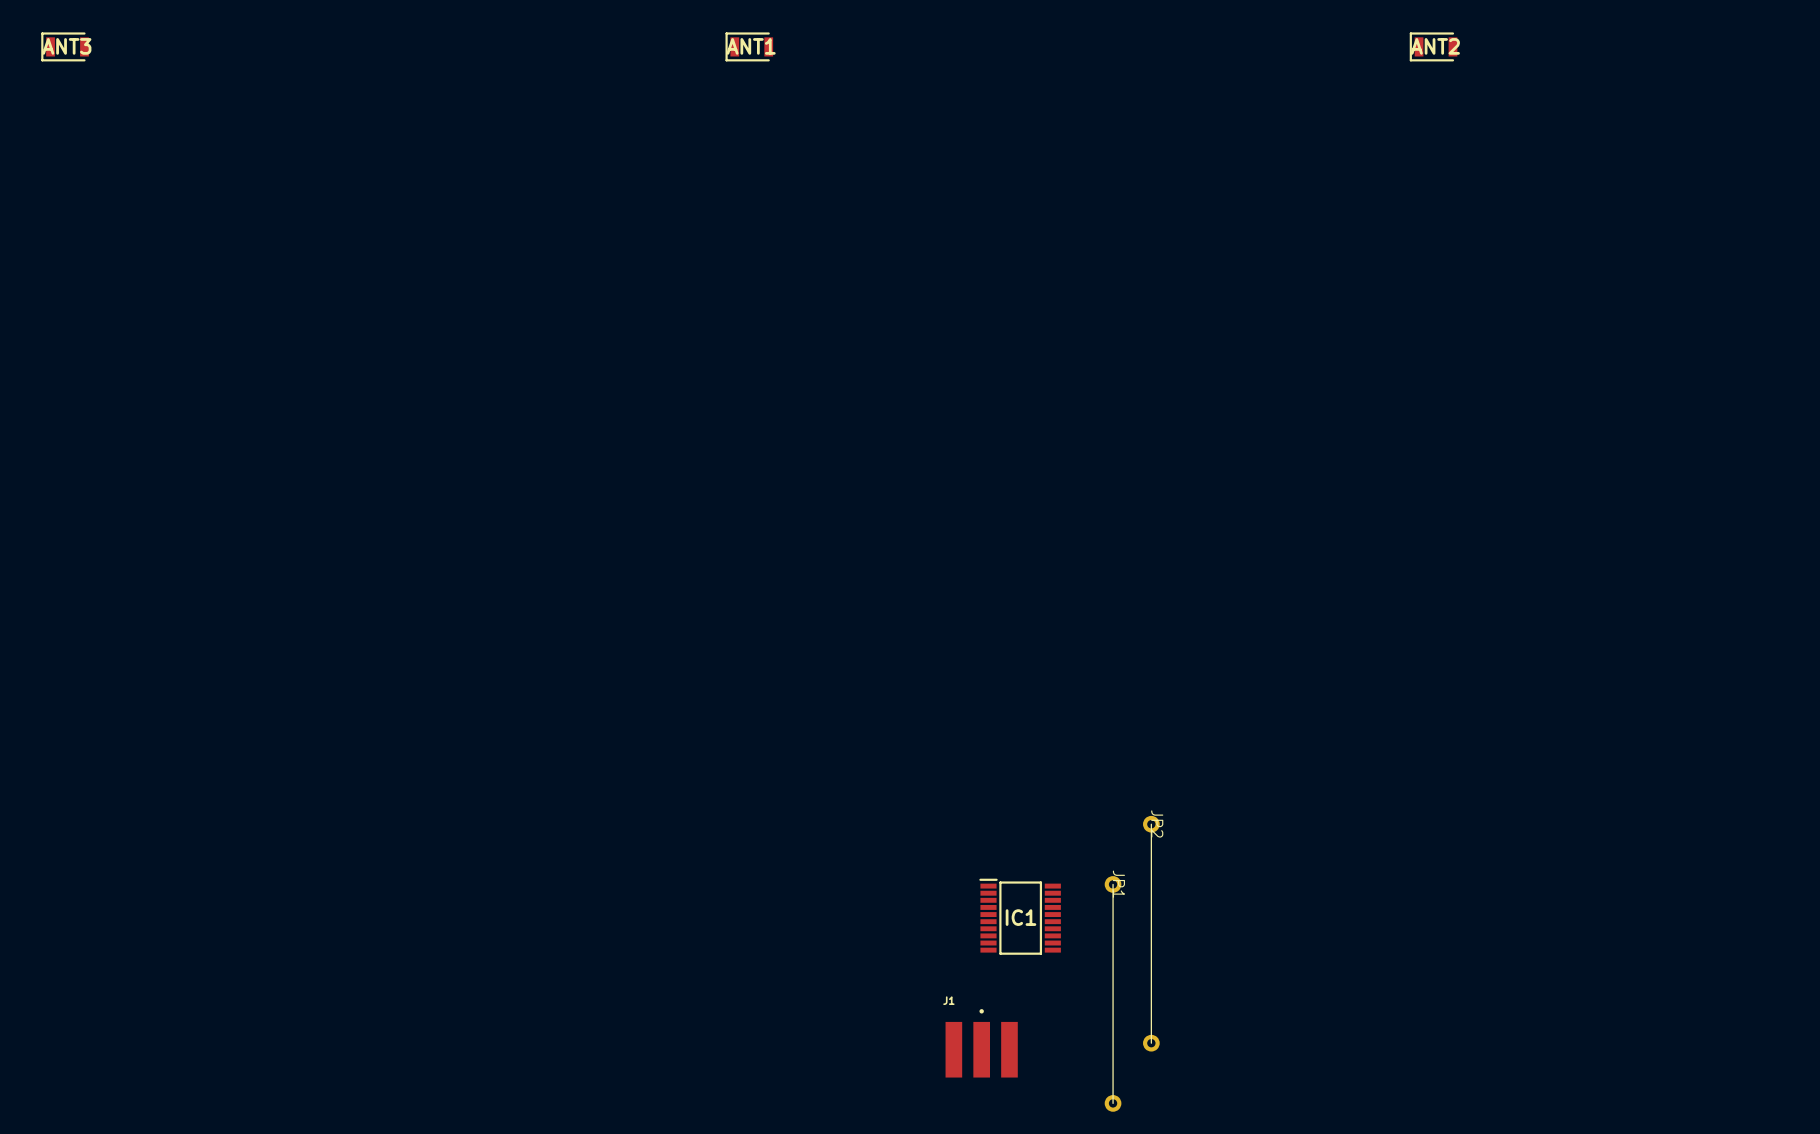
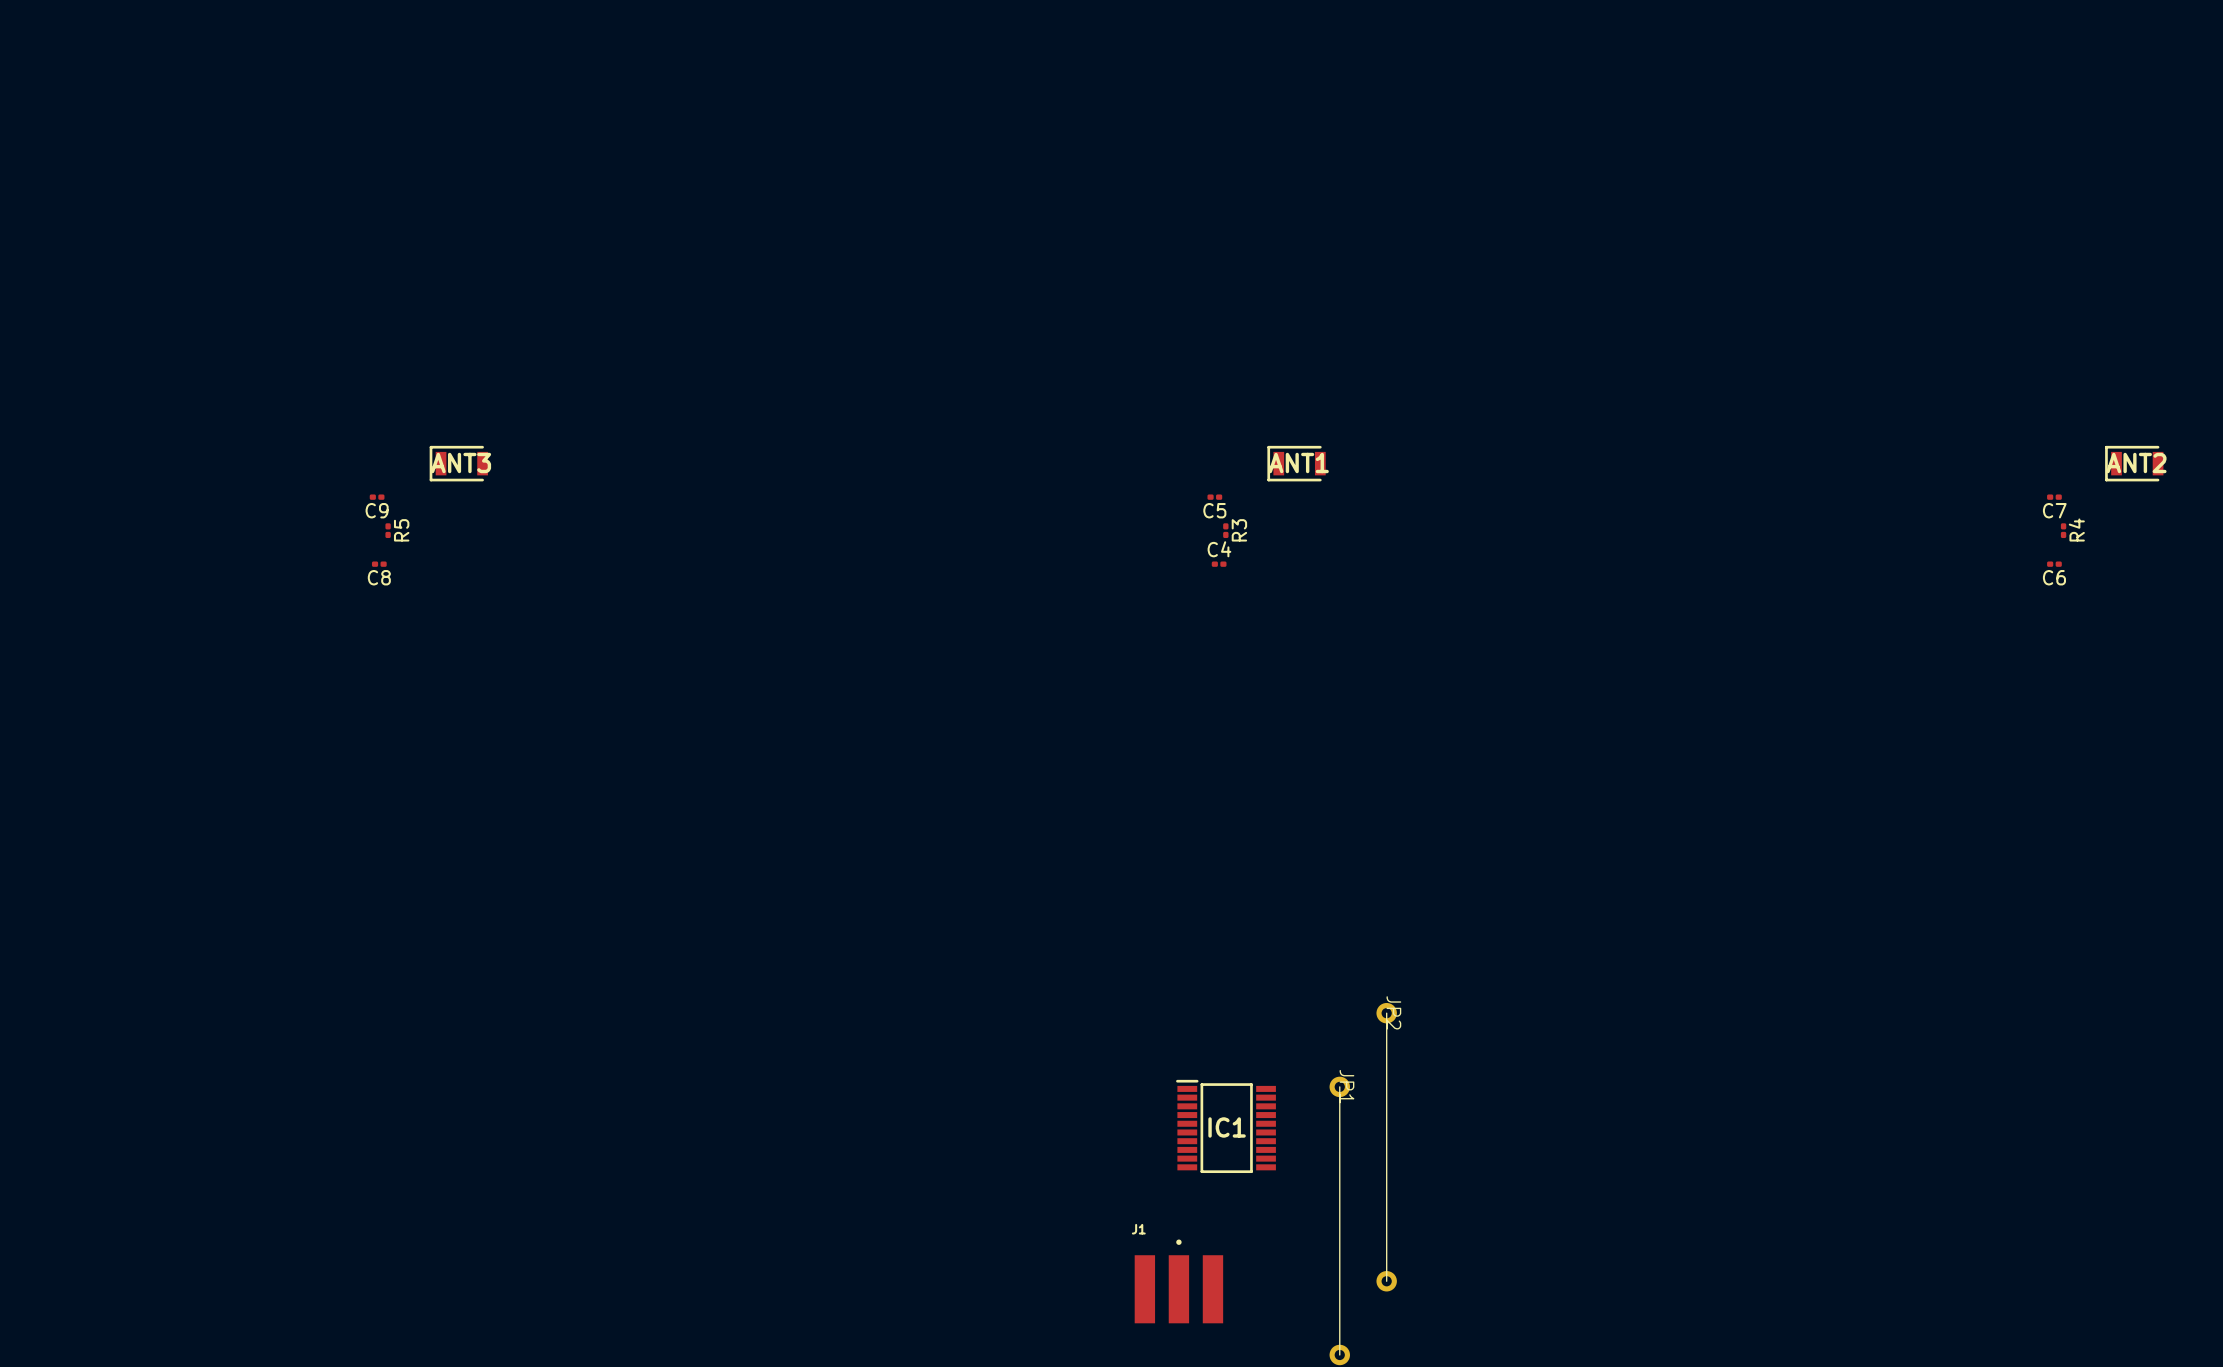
ANT3 position: (65, 46) -> (458, 463)
ANT1 position: (749, 46) -> (1296, 463)
ANT2 position: (1433, 46) -> (2134, 463)
C9: none -> (377, 497)
C5: none -> (1214, 497)
C7: none -> (2054, 497)
R5: none -> (388, 530)
R3: none -> (1225, 530)
R4: none -> (2063, 530)
C8: none -> (379, 564)
C4: none -> (1219, 564)
C6: none -> (2054, 564)

